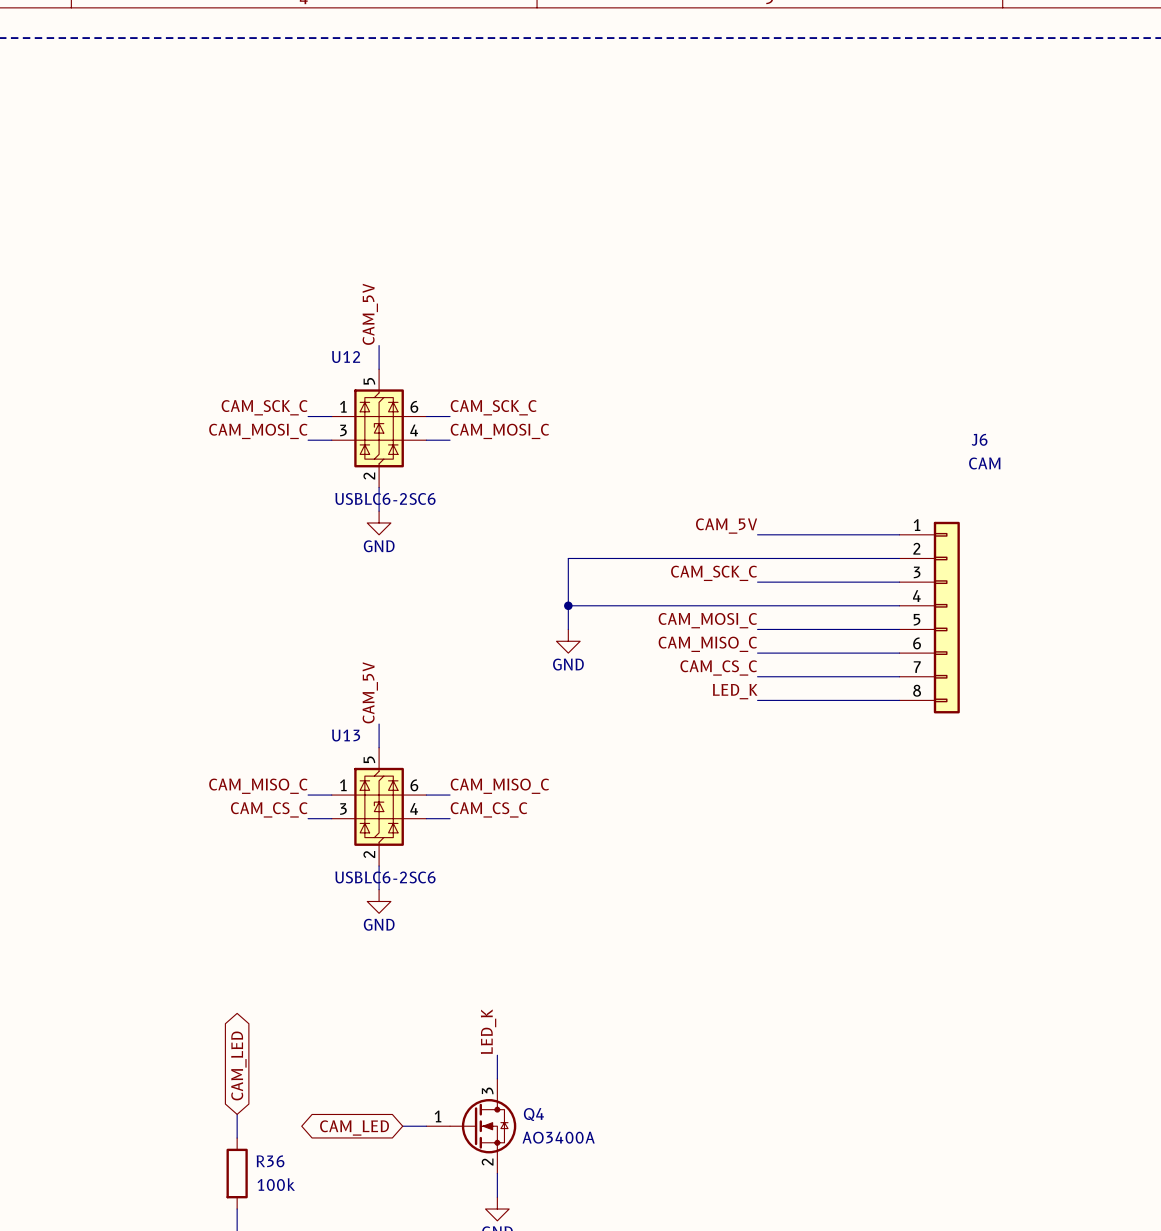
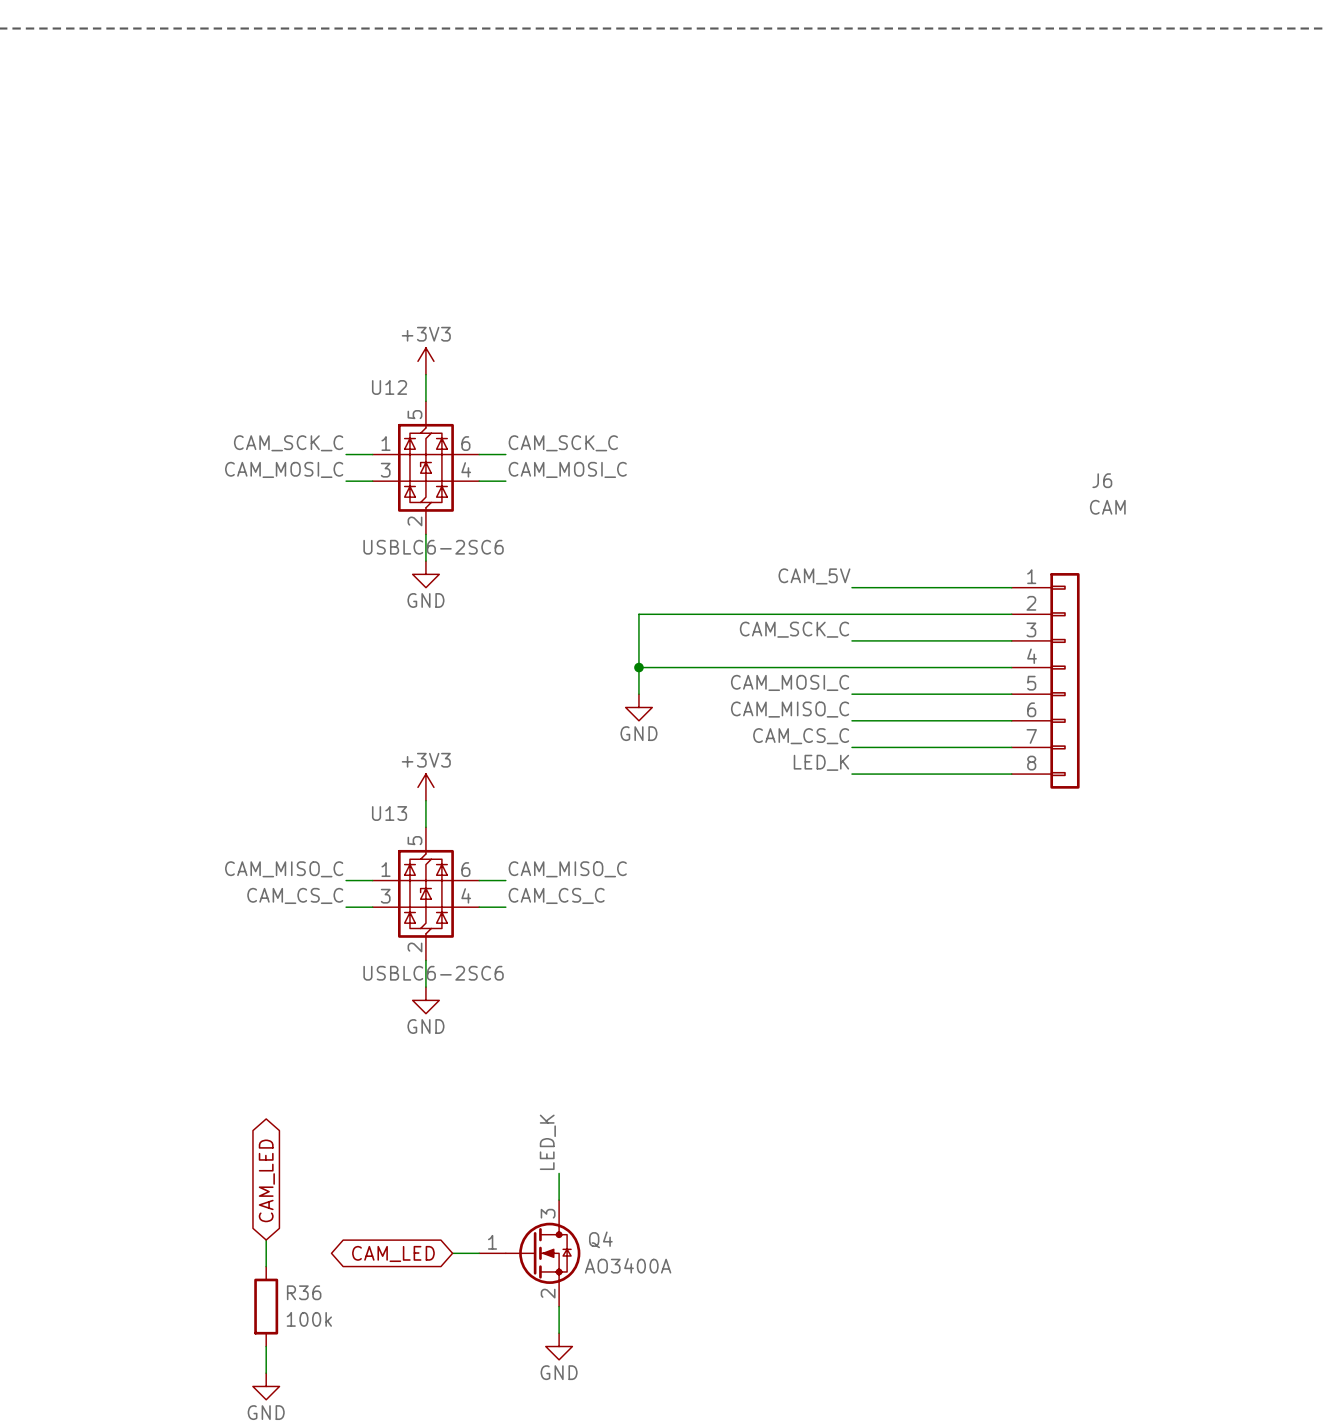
label: CAM_5V (370, 314) -> none
power symbol: none -> +3V3 (425, 361)
label: CAM_5V (370, 692) -> none
power symbol: none -> +3V3 (425, 787)

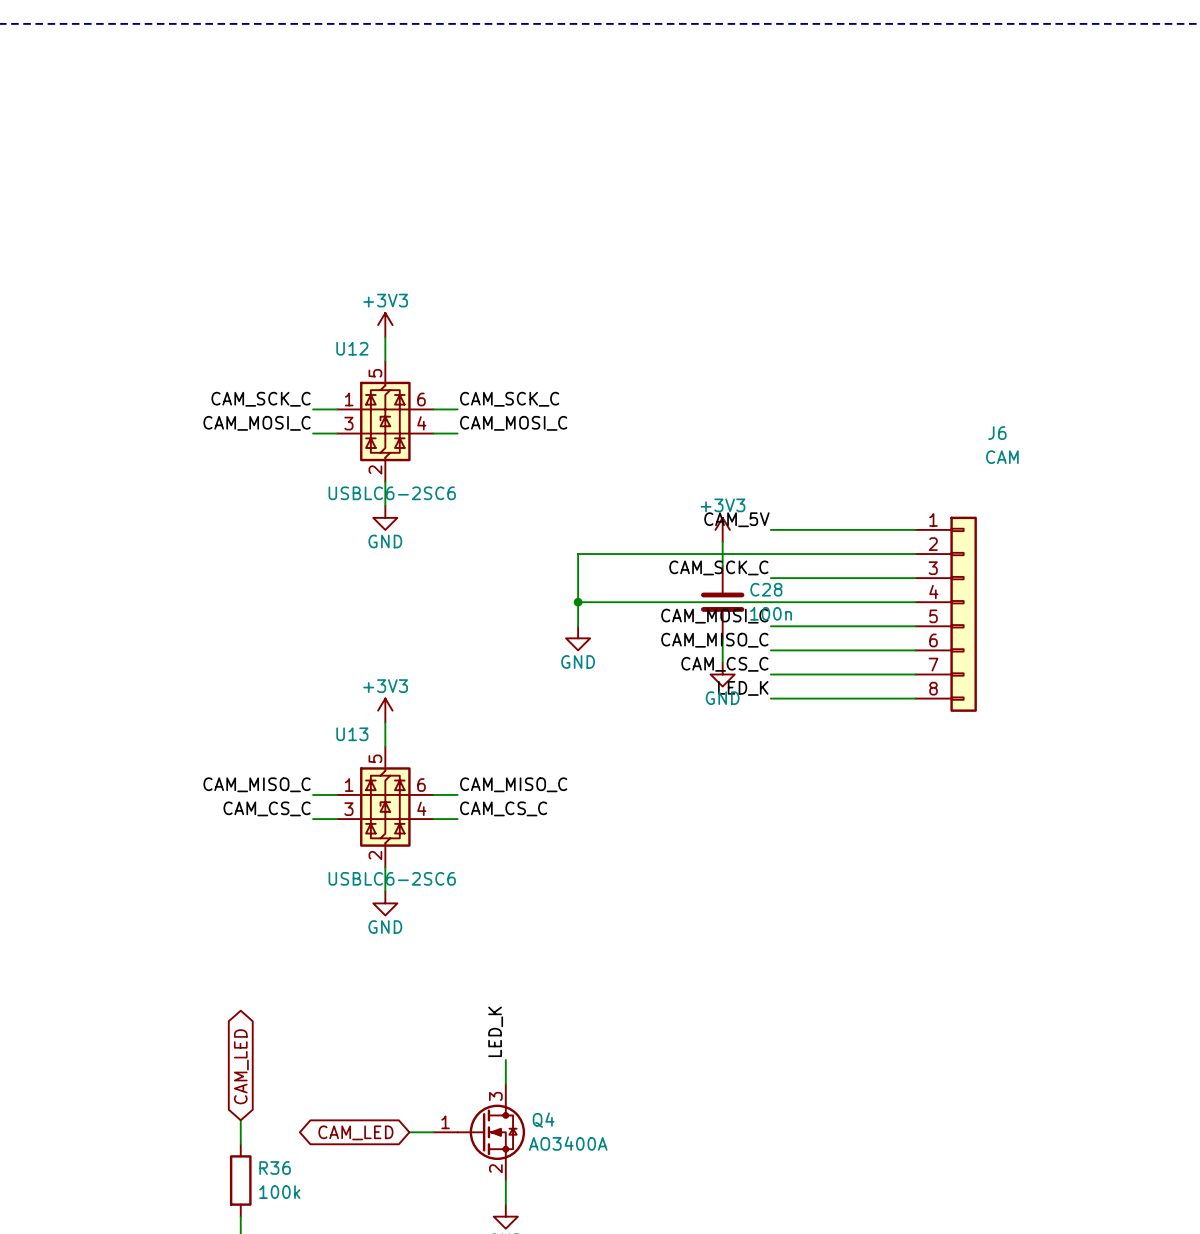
power symbol: none -> +3V3 (722, 529)
wire: none -> (722, 541) (722, 566)
C28: none -> 100n (722, 602)
wire: none -> (722, 638) (722, 662)
power symbol: none -> GND (722, 674)

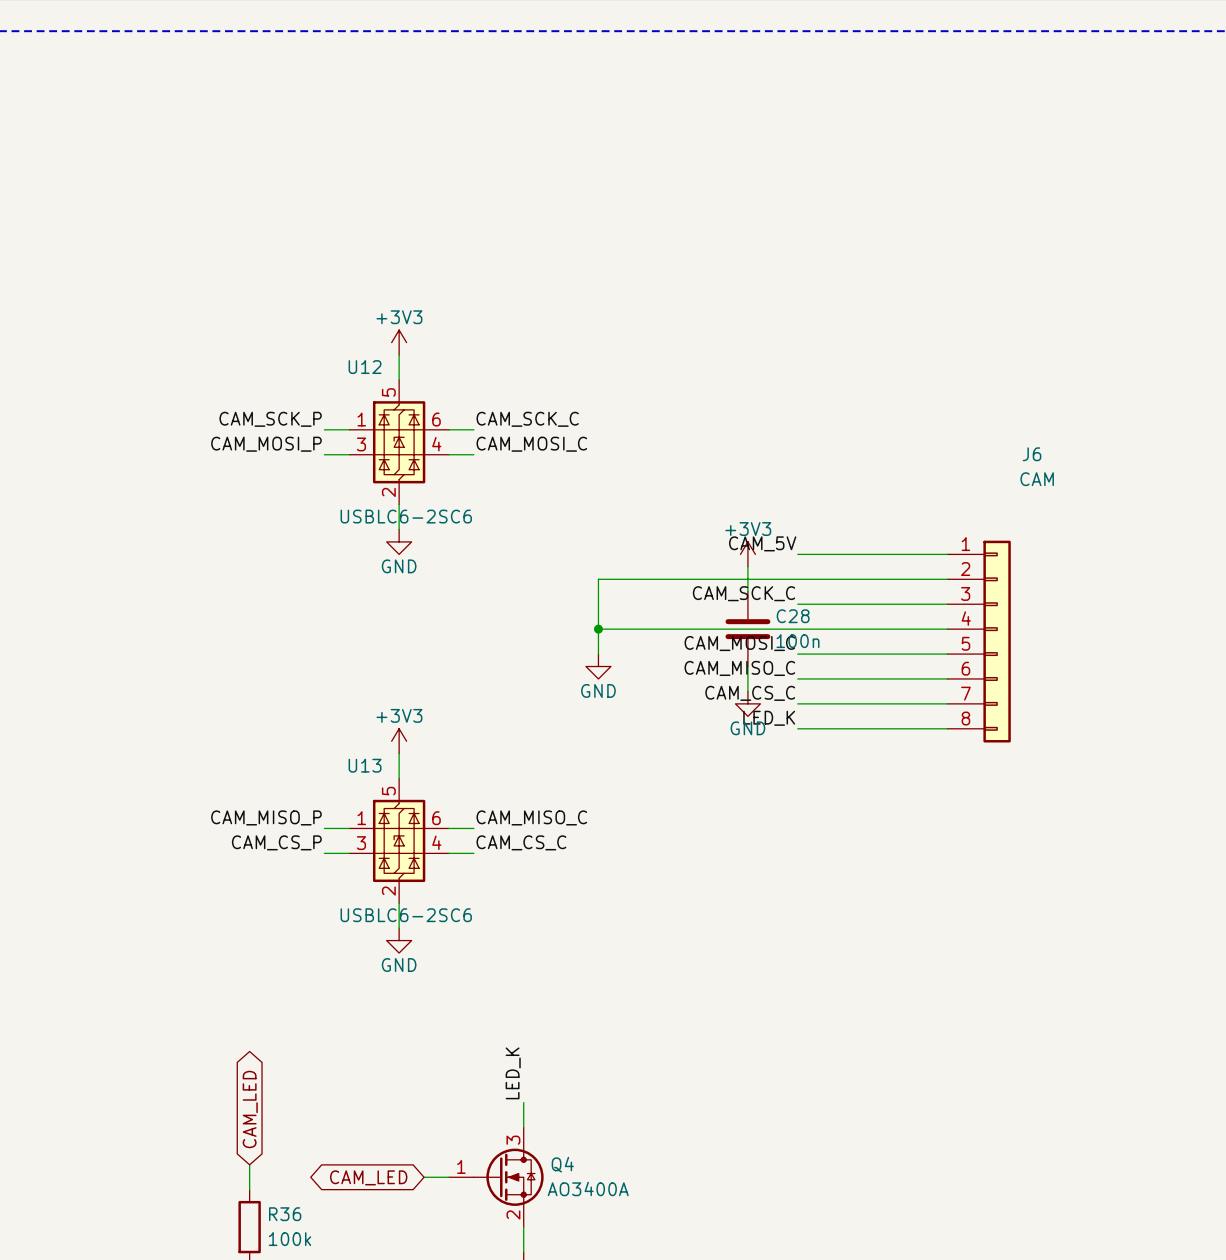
label: CAM_SCK_C (261, 399) -> CAM_SCK_P (270, 419)
label: CAM_MOSI_C (257, 423) -> CAM_MOSI_P (266, 444)
label: CAM_MISO_C (257, 784) -> CAM_MISO_P (266, 817)
label: CAM_CS_C (267, 808) -> CAM_CS_P (276, 842)

